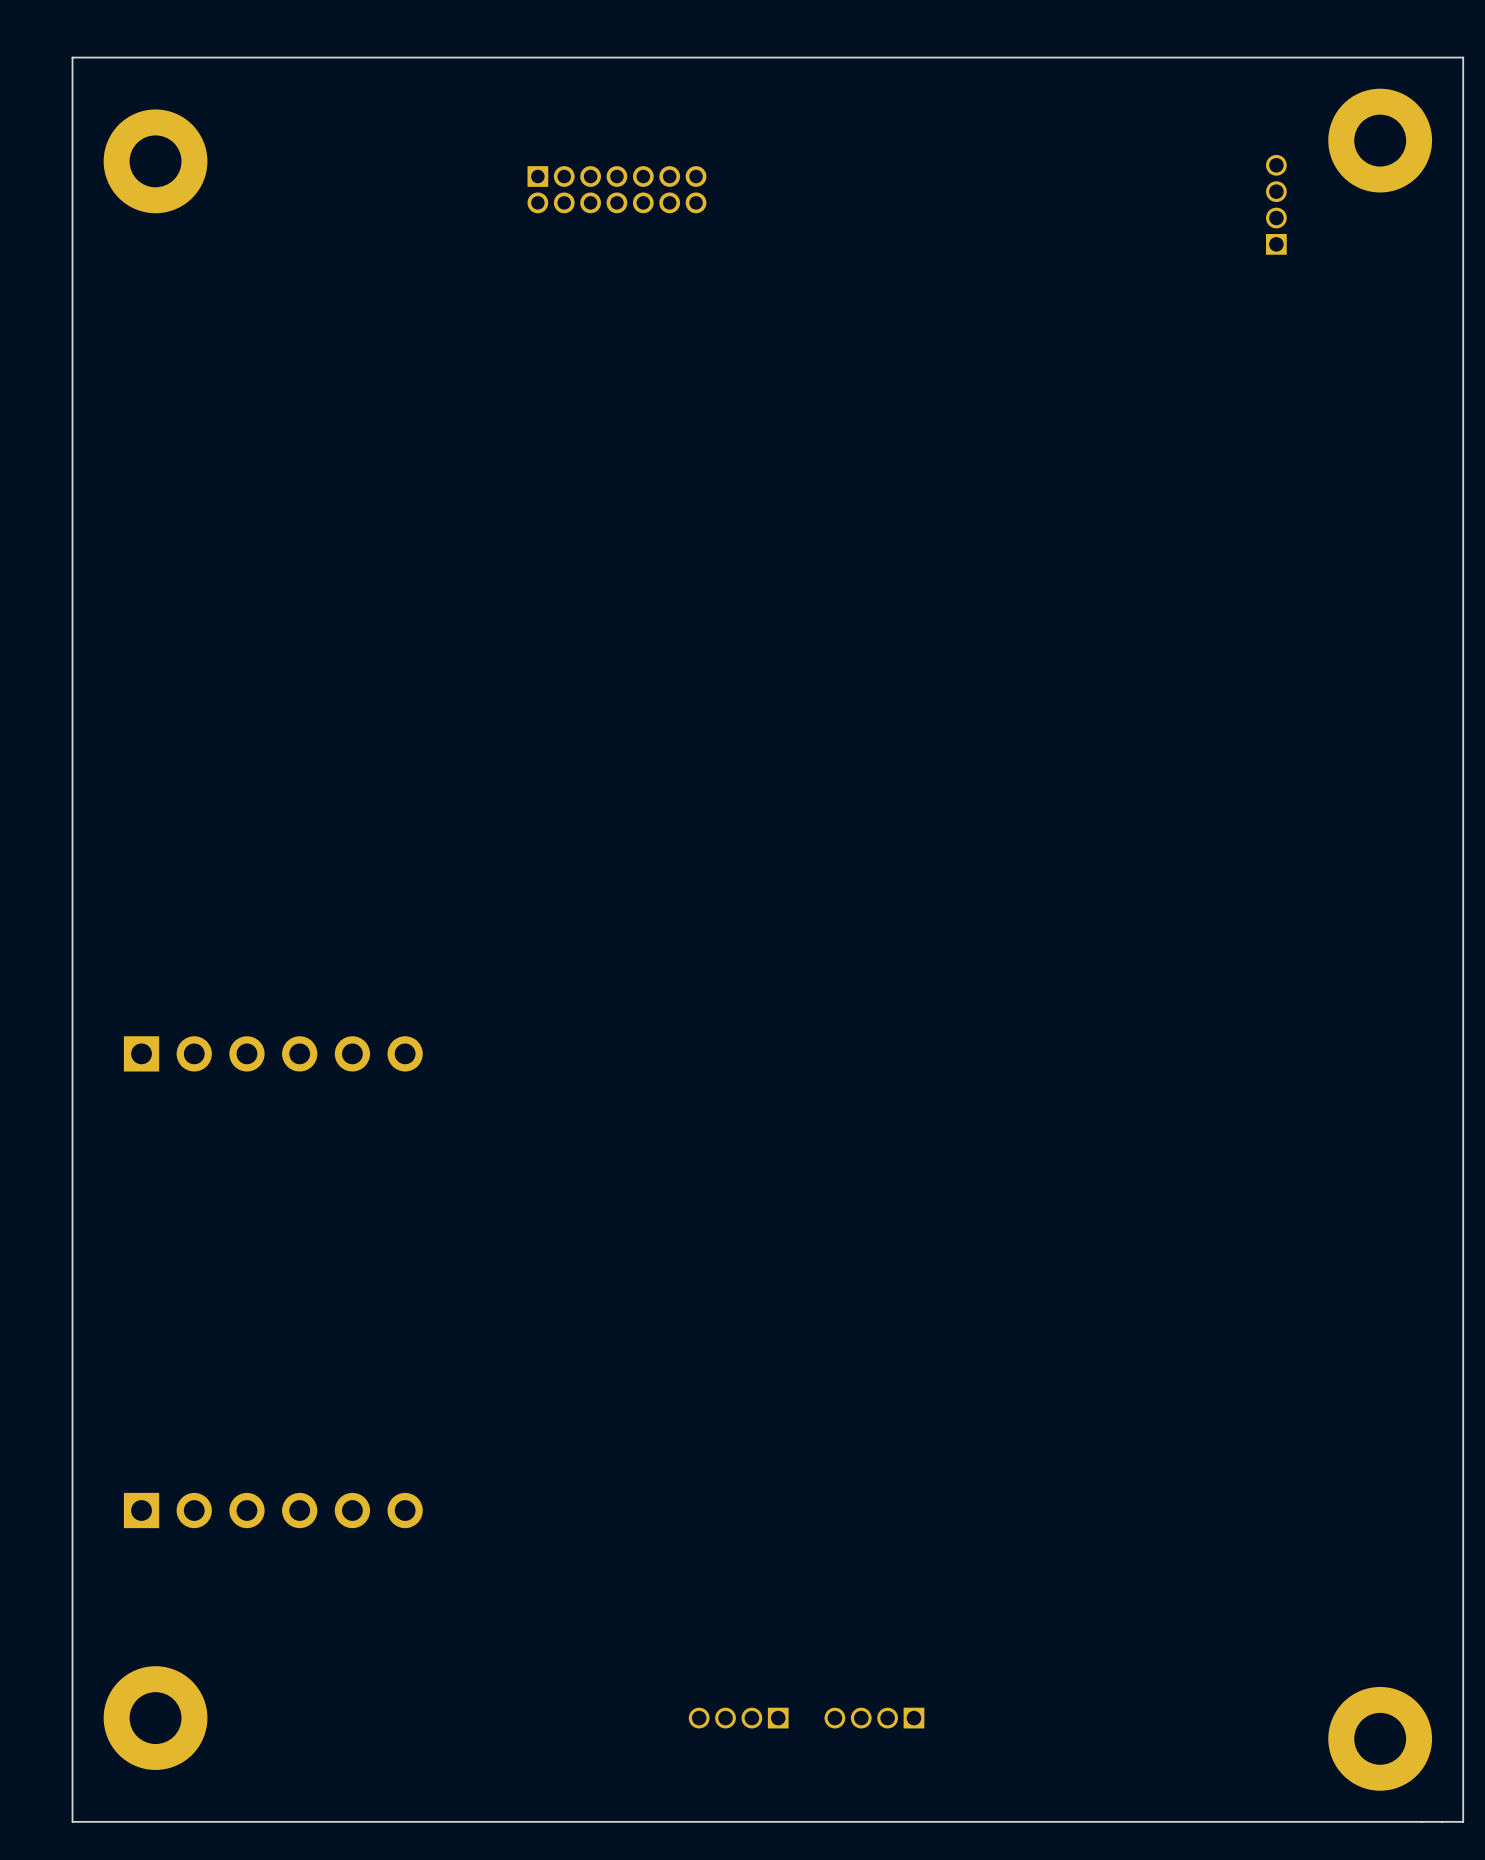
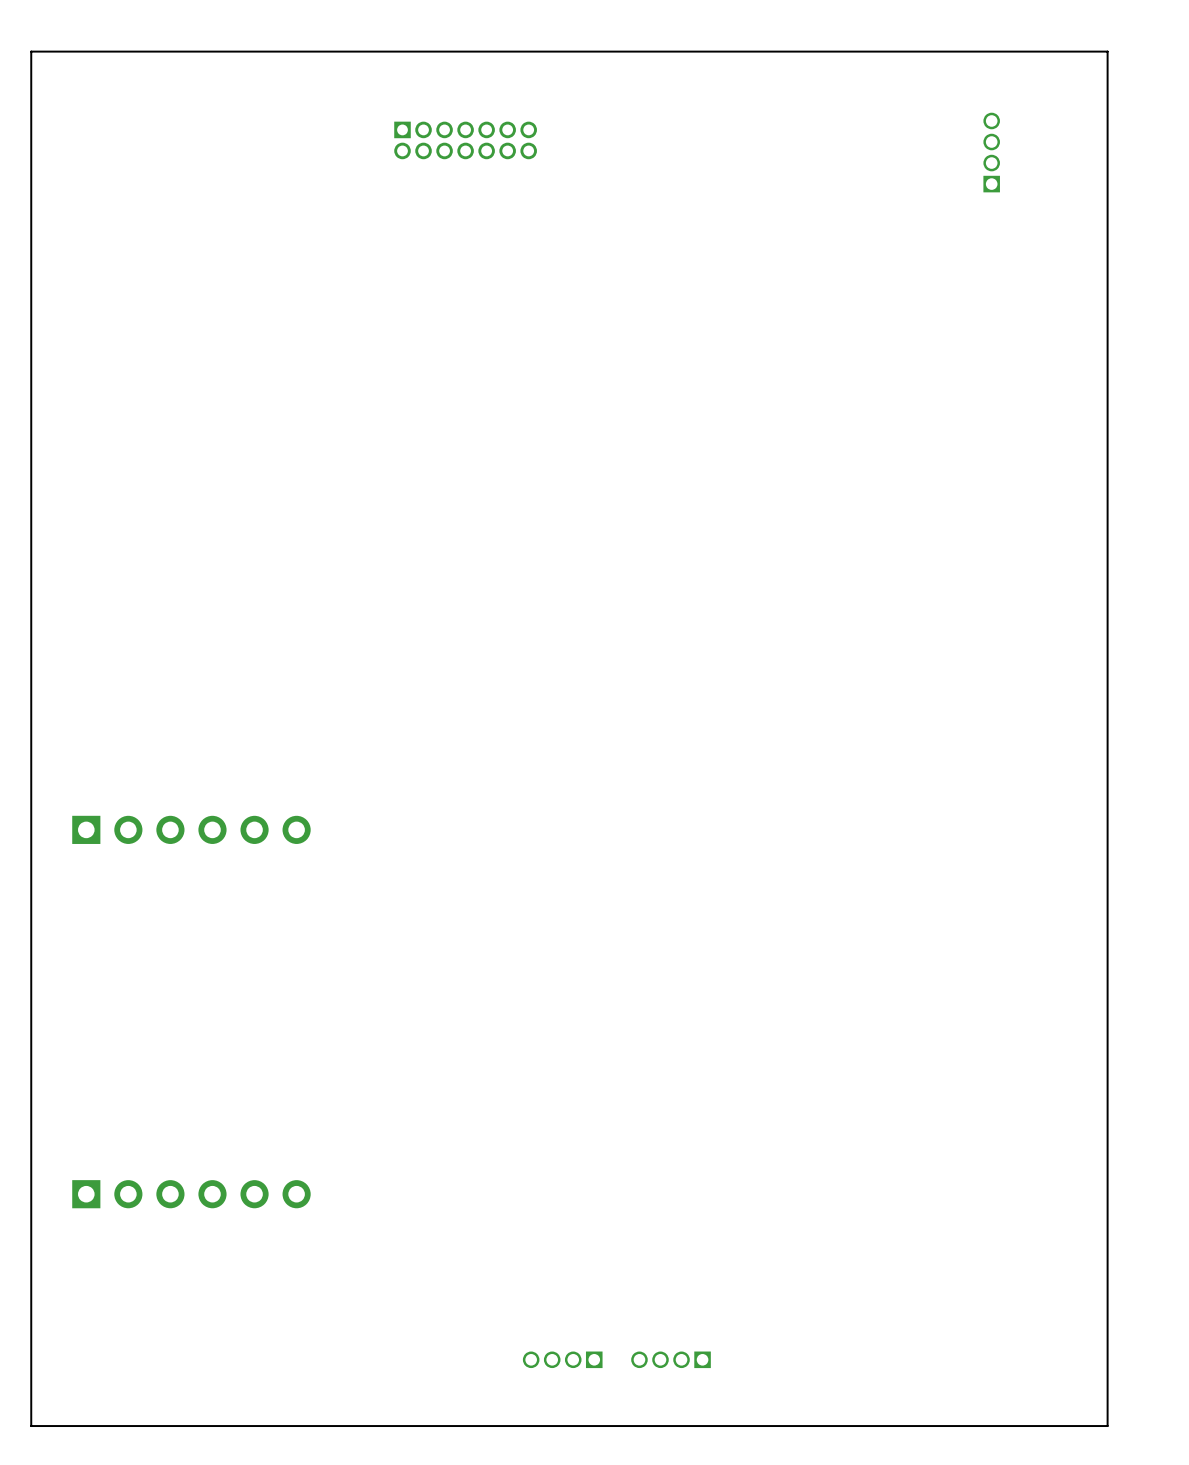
board edge: (72, 78) (72, 57) (1463, 57) (1463, 1821) (72, 1821) (72, 1801) -> (31, 51) (1107, 51) (1107, 1426) (31, 1426)
part: (1380, 140) -> none
part: (155, 161) -> none
part: (155, 1718) -> none
part: (1380, 1738) -> none

